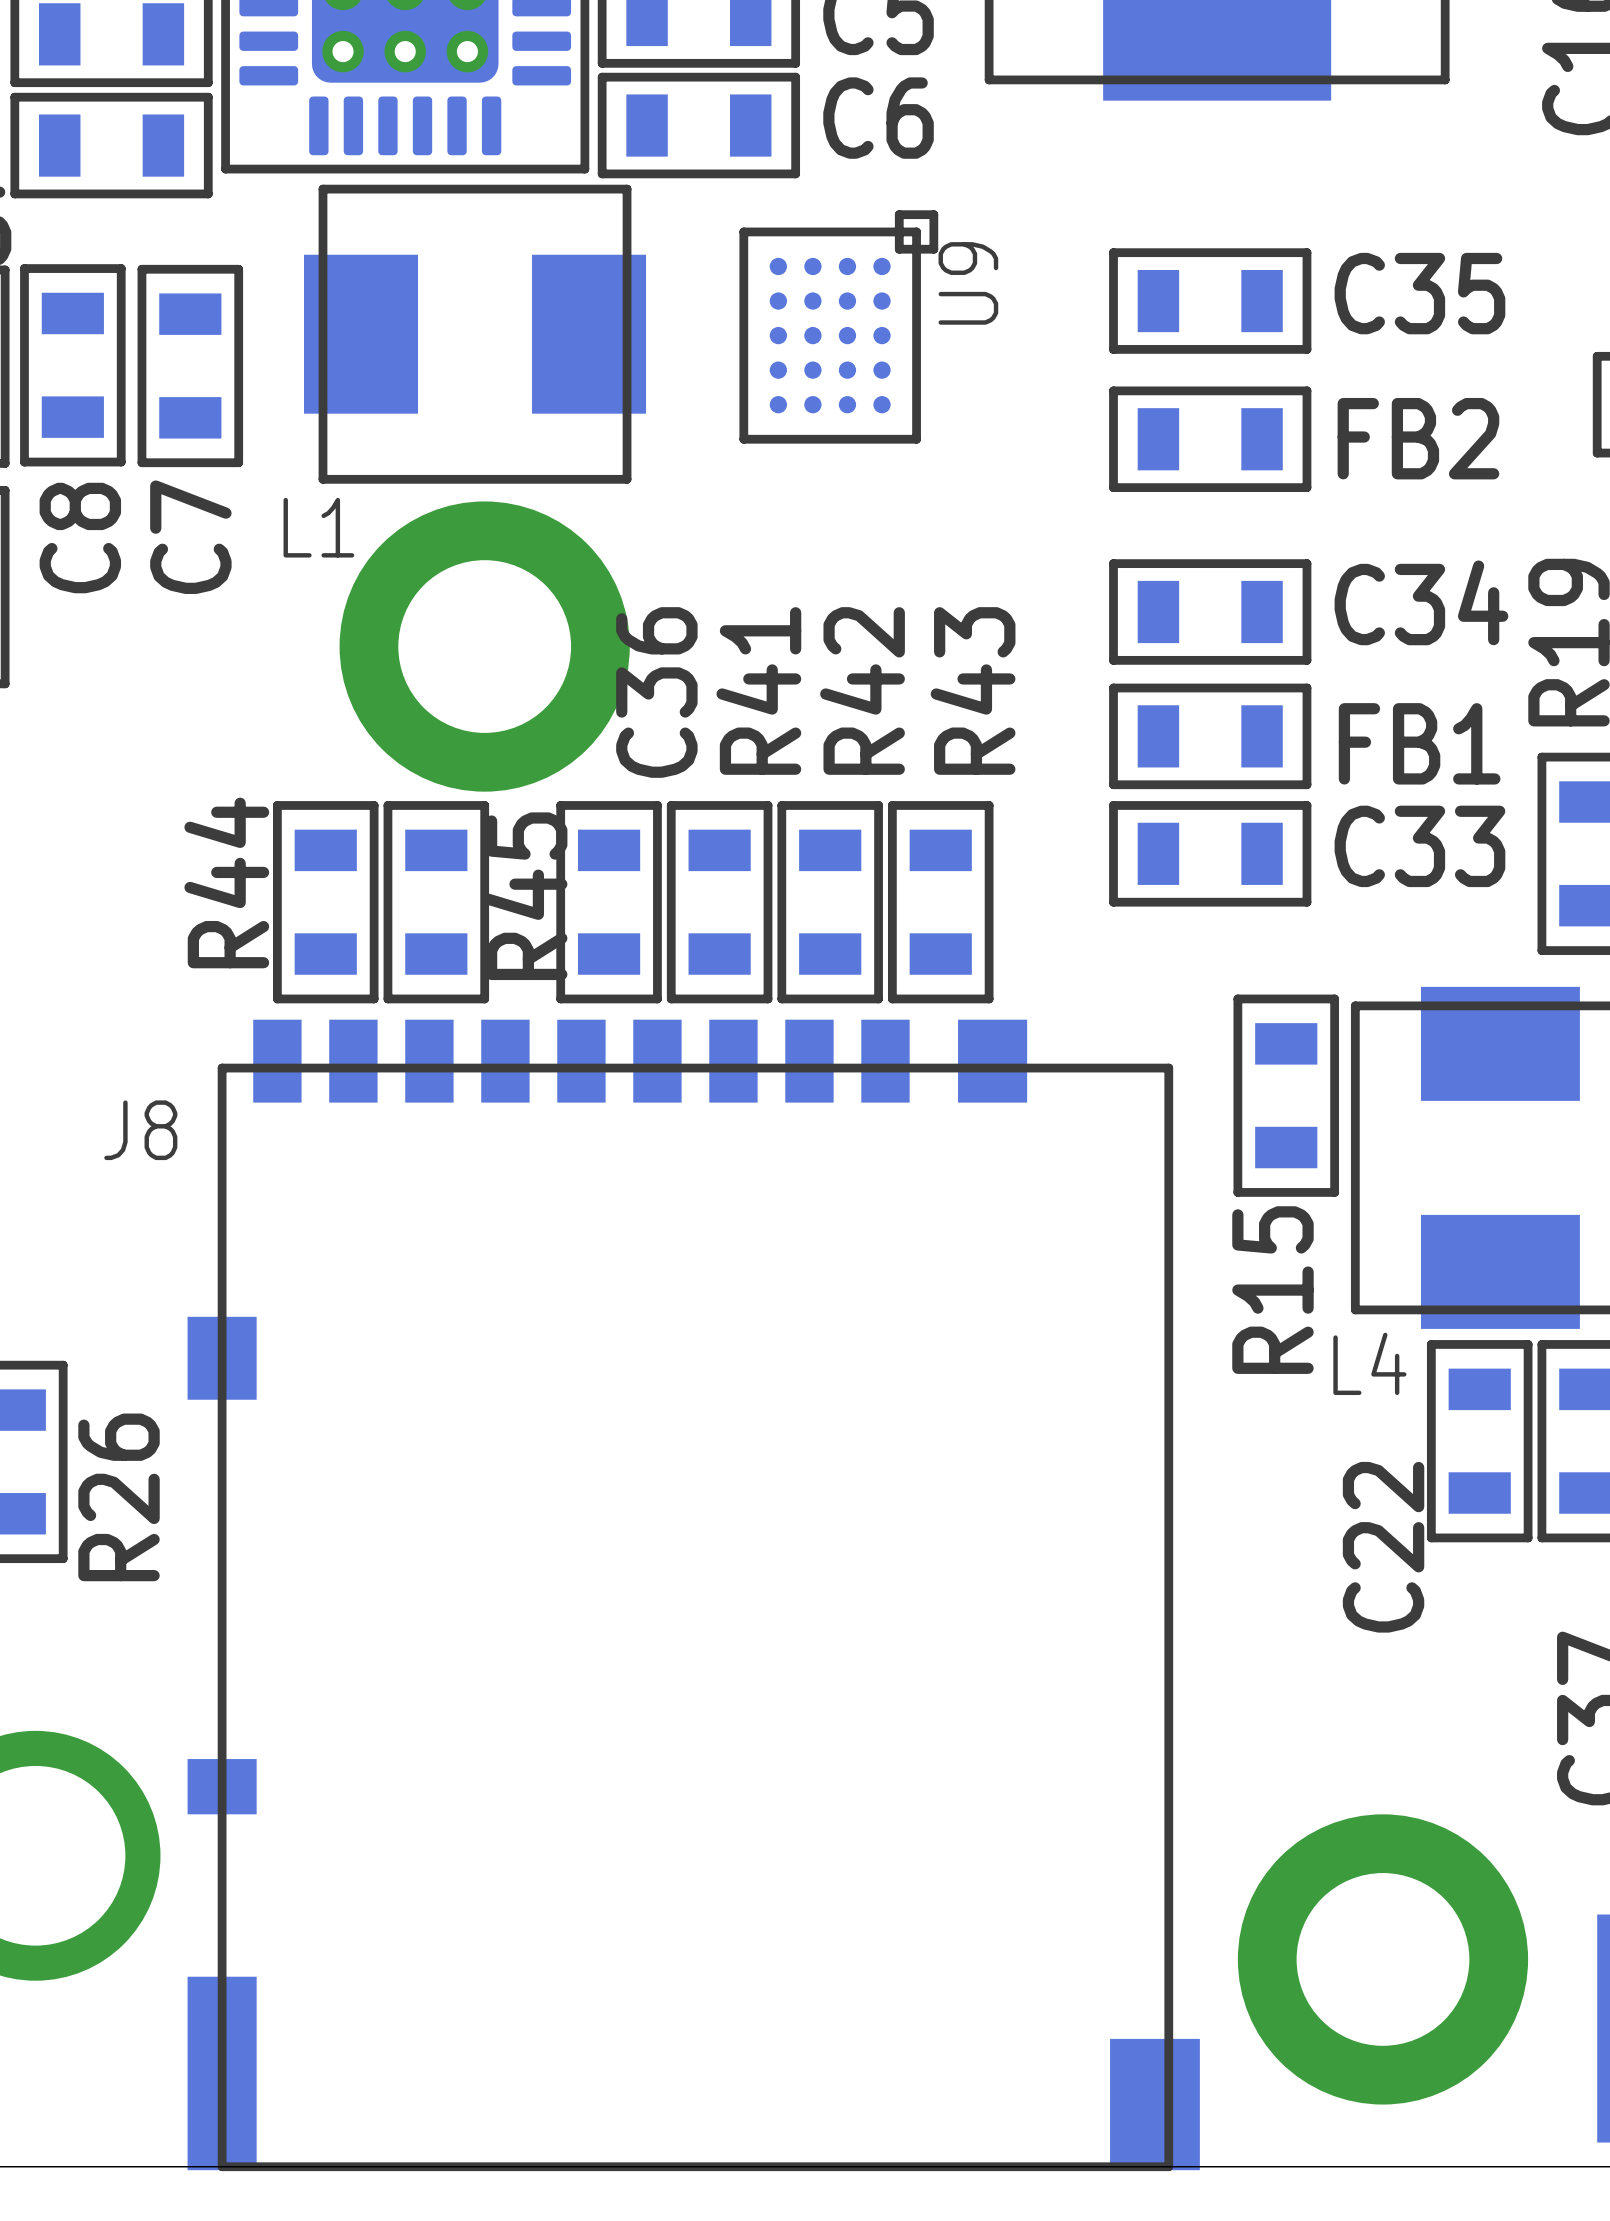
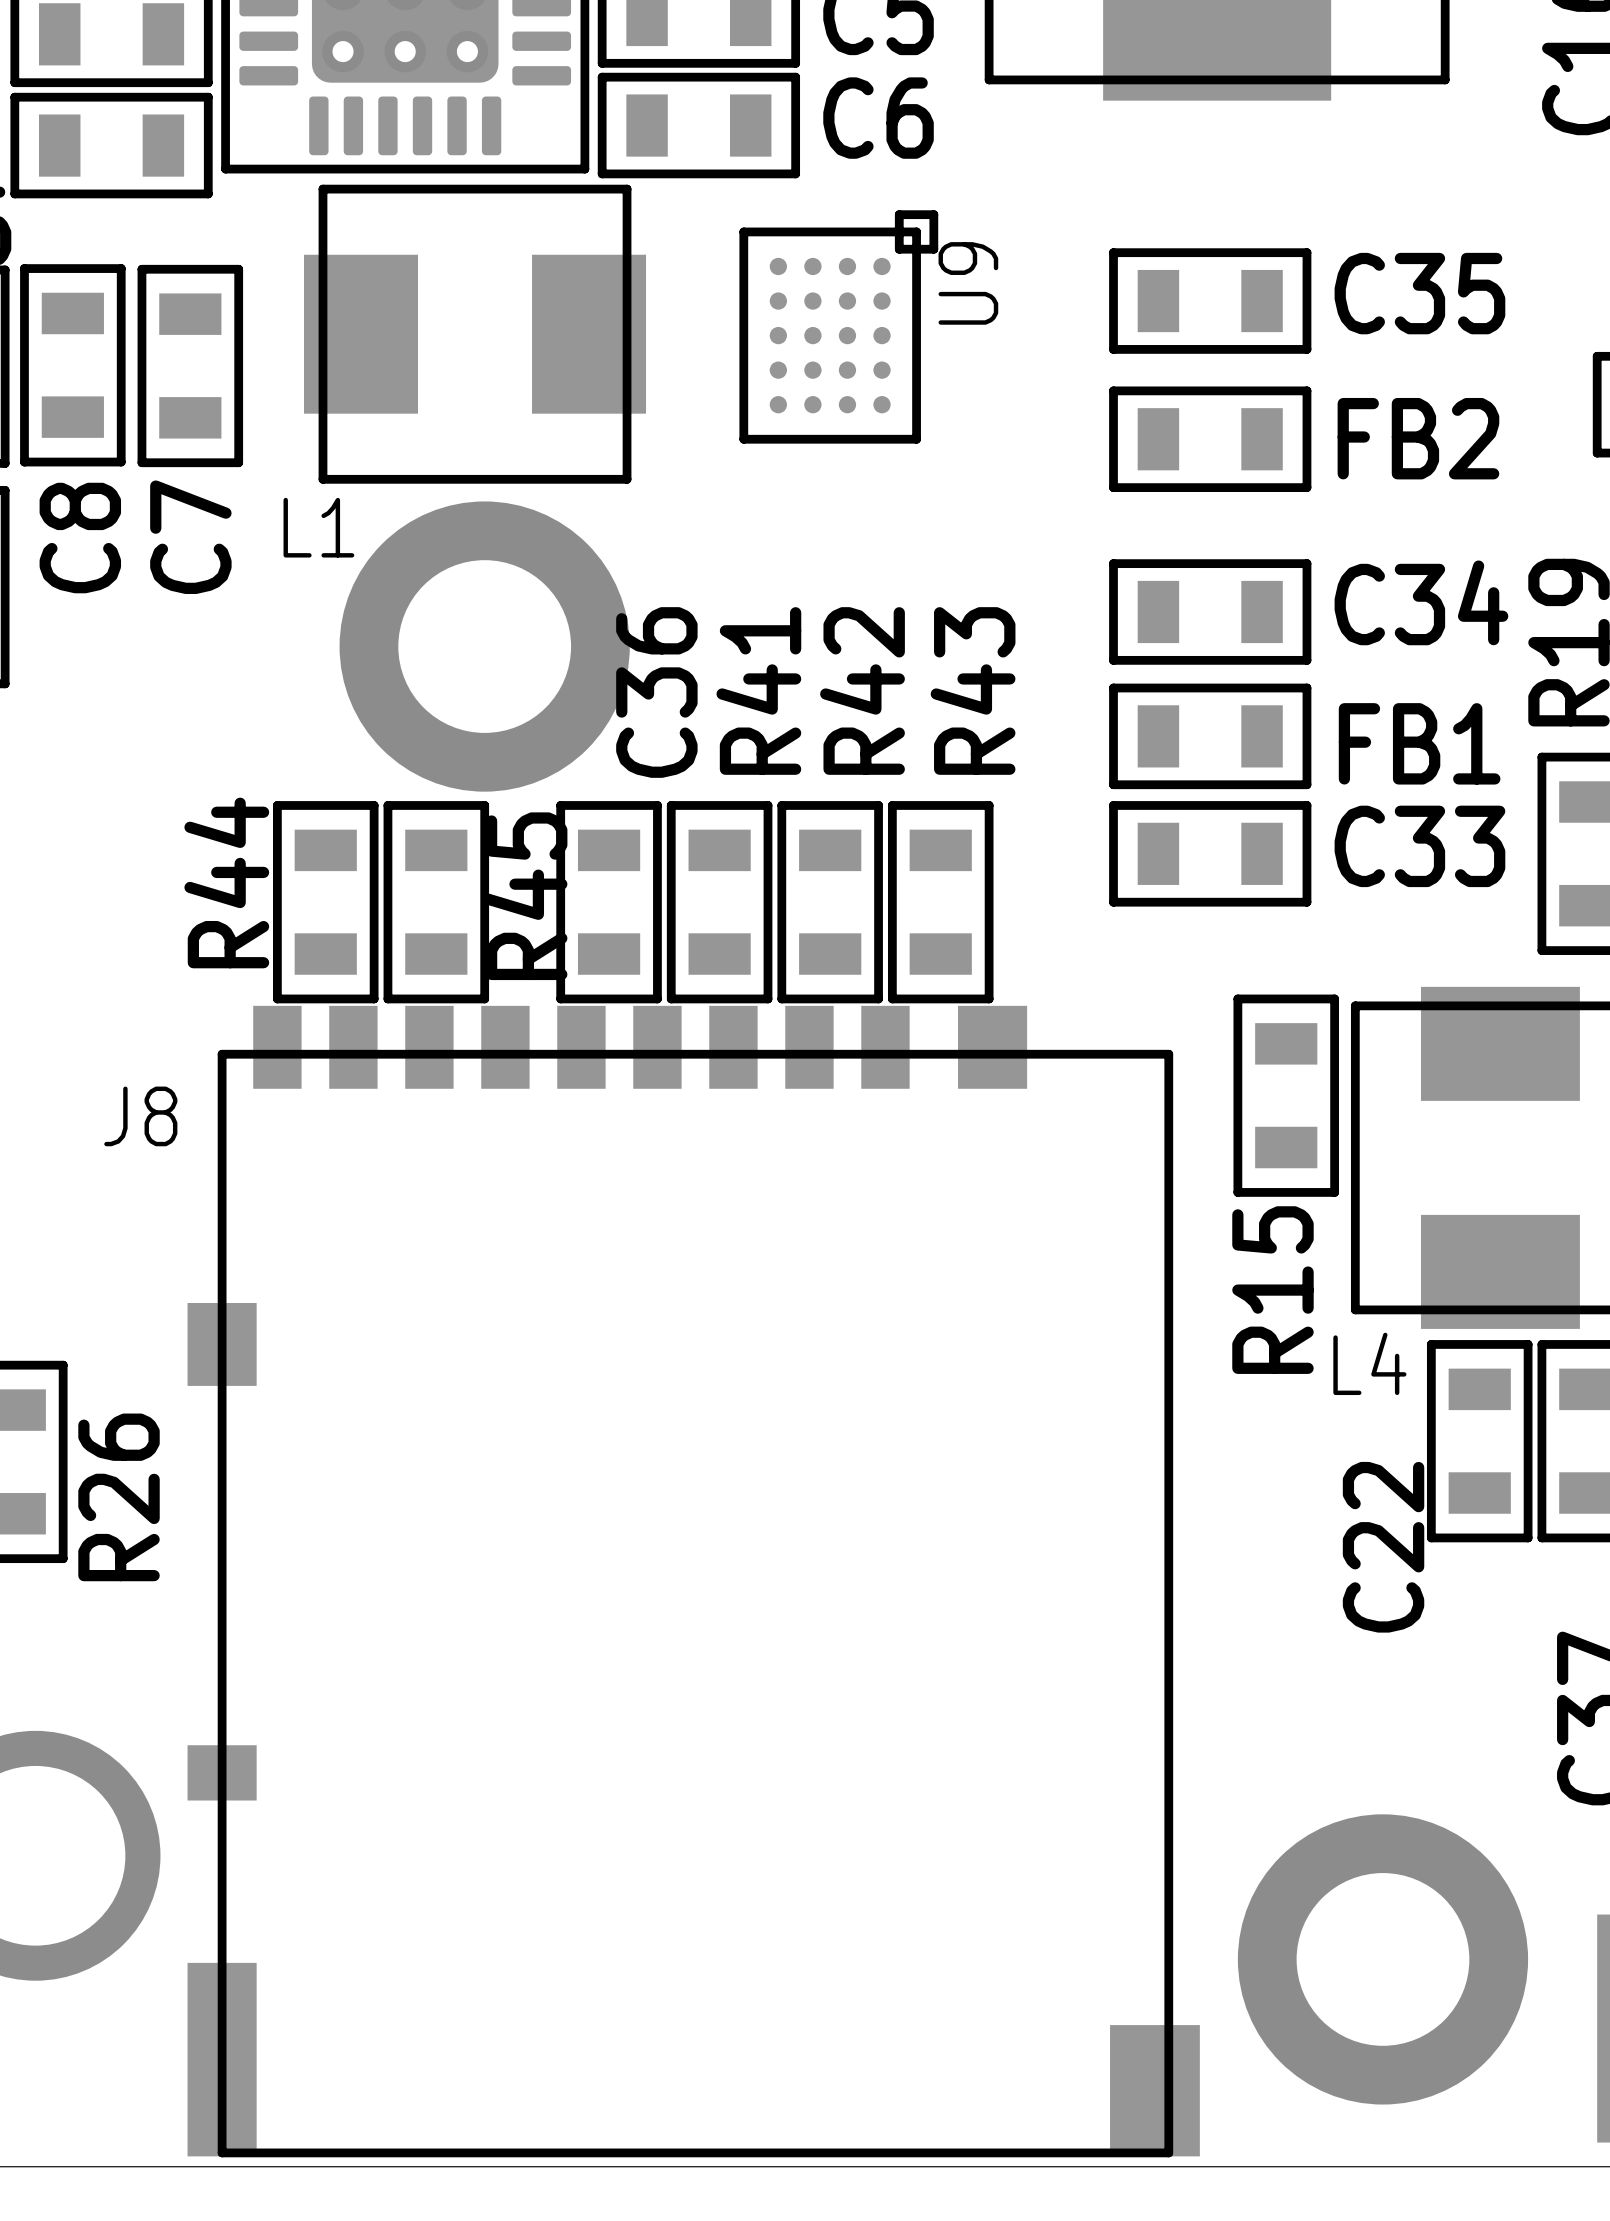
J8 position: (693, 1595) -> (693, 1581)

